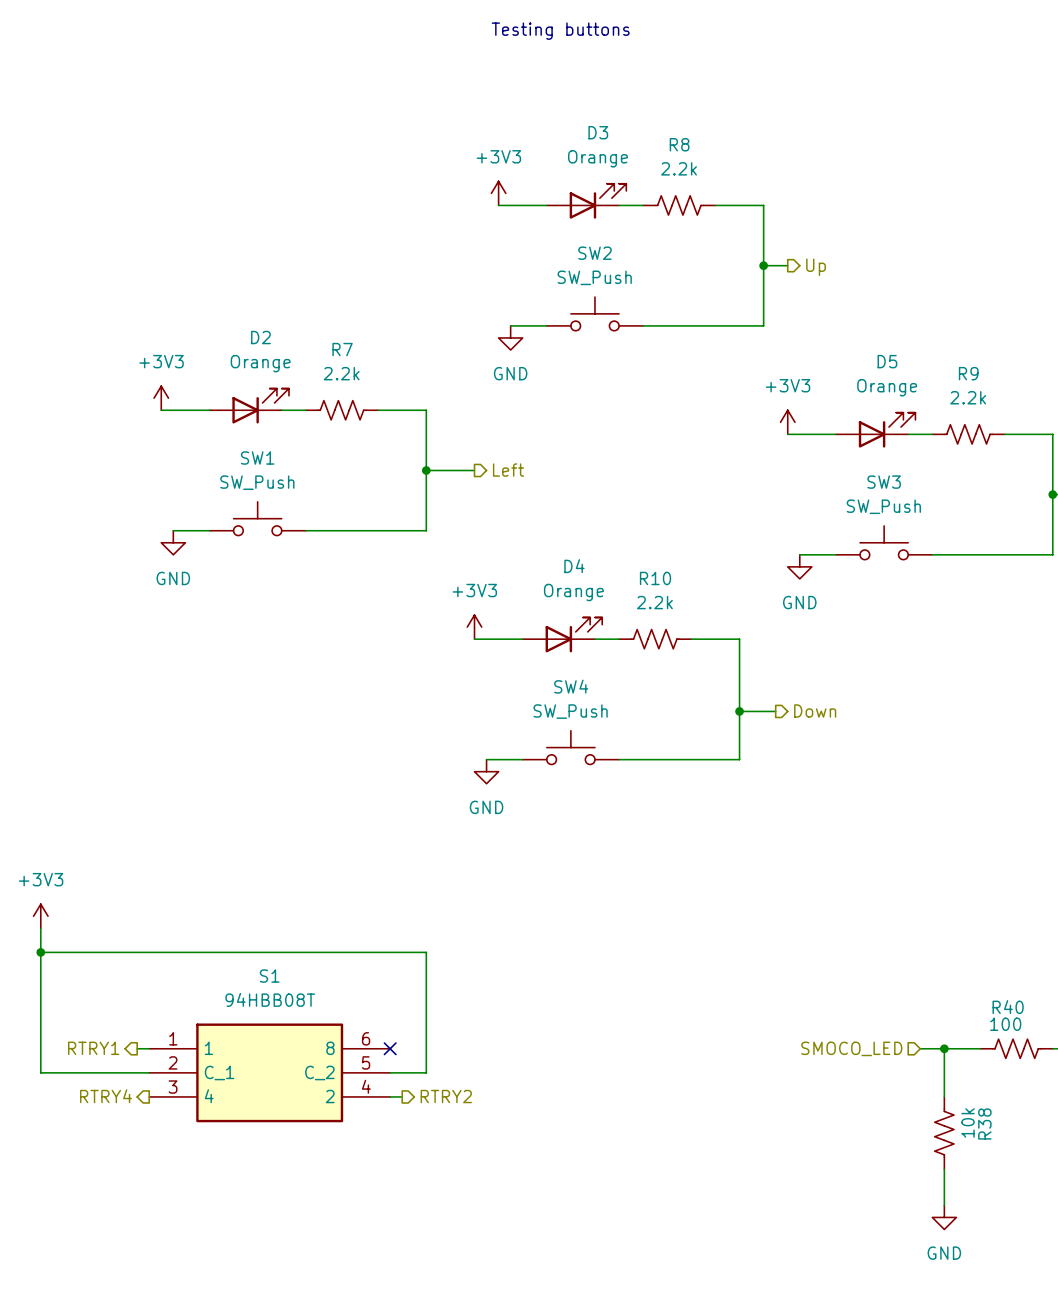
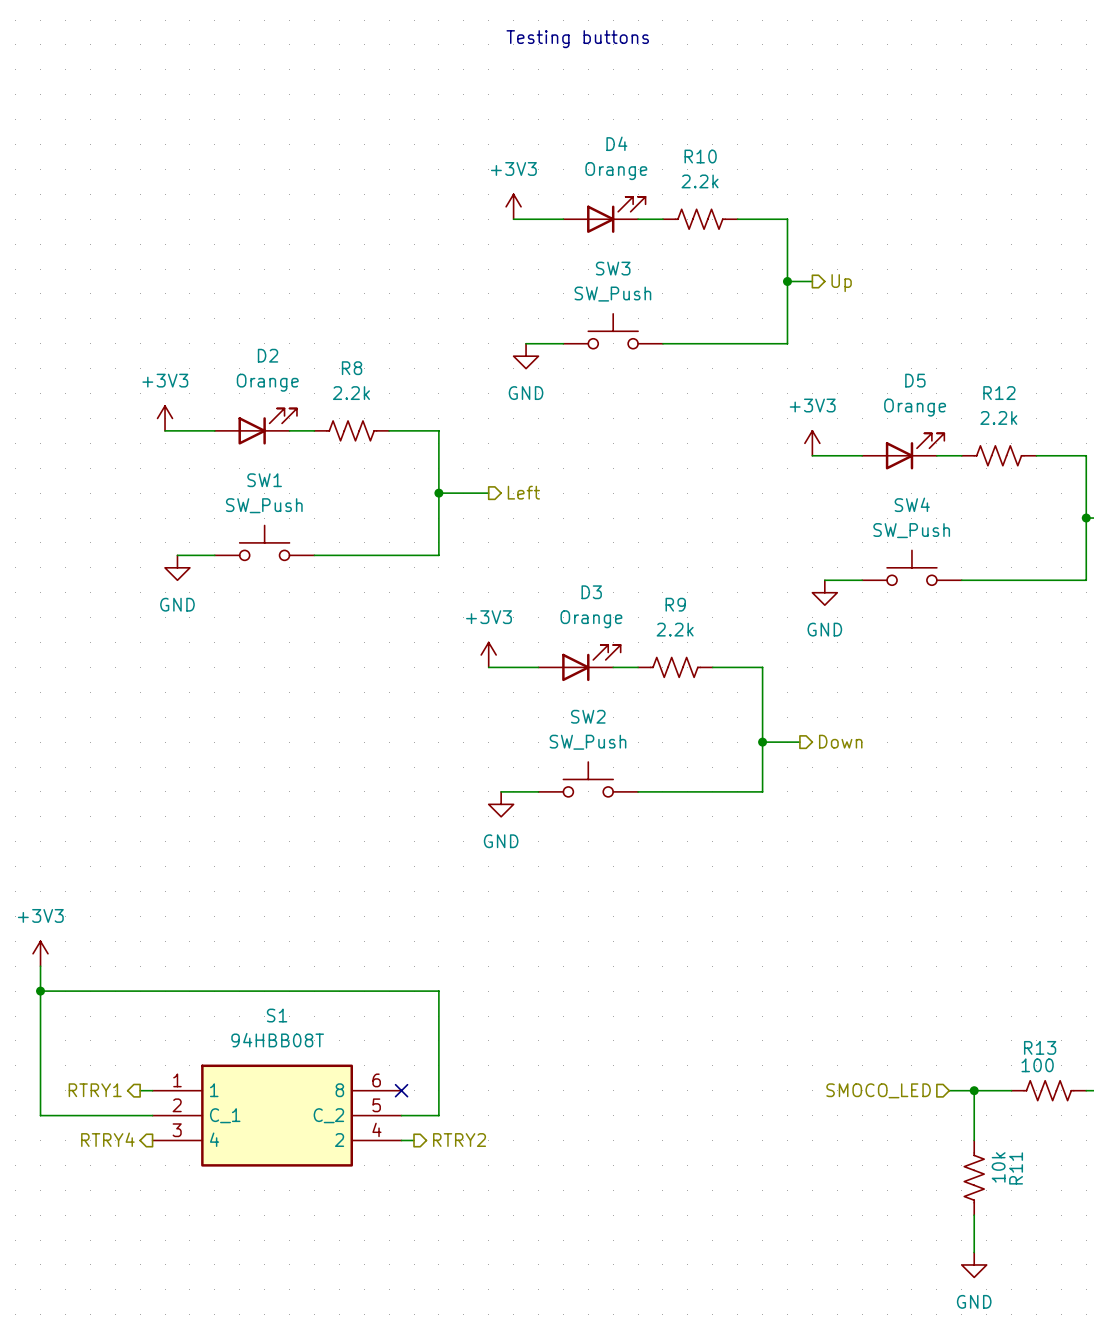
D3 name: D3 (598, 132) -> D4 (616, 143)
R8 name: R8 (679, 144) -> R10 (700, 156)
SW2 name: SW2 (594, 253) -> SW3 (613, 268)
R7 name: R7 (342, 349) -> R8 (352, 368)
R9 name: R9 (968, 373) -> R12 (999, 393)
SW3 name: SW3 (884, 482) -> SW4 (912, 504)
D4 name: D4 (574, 566) -> D3 (591, 592)
R10 name: R10 (655, 578) -> R9 (675, 604)
SW4 name: SW4 (571, 686) -> SW2 (588, 716)
R40 name: R40 (1008, 1007) -> R13 (1040, 1047)
R38 name: R38 (984, 1124) -> R11 (1016, 1168)

